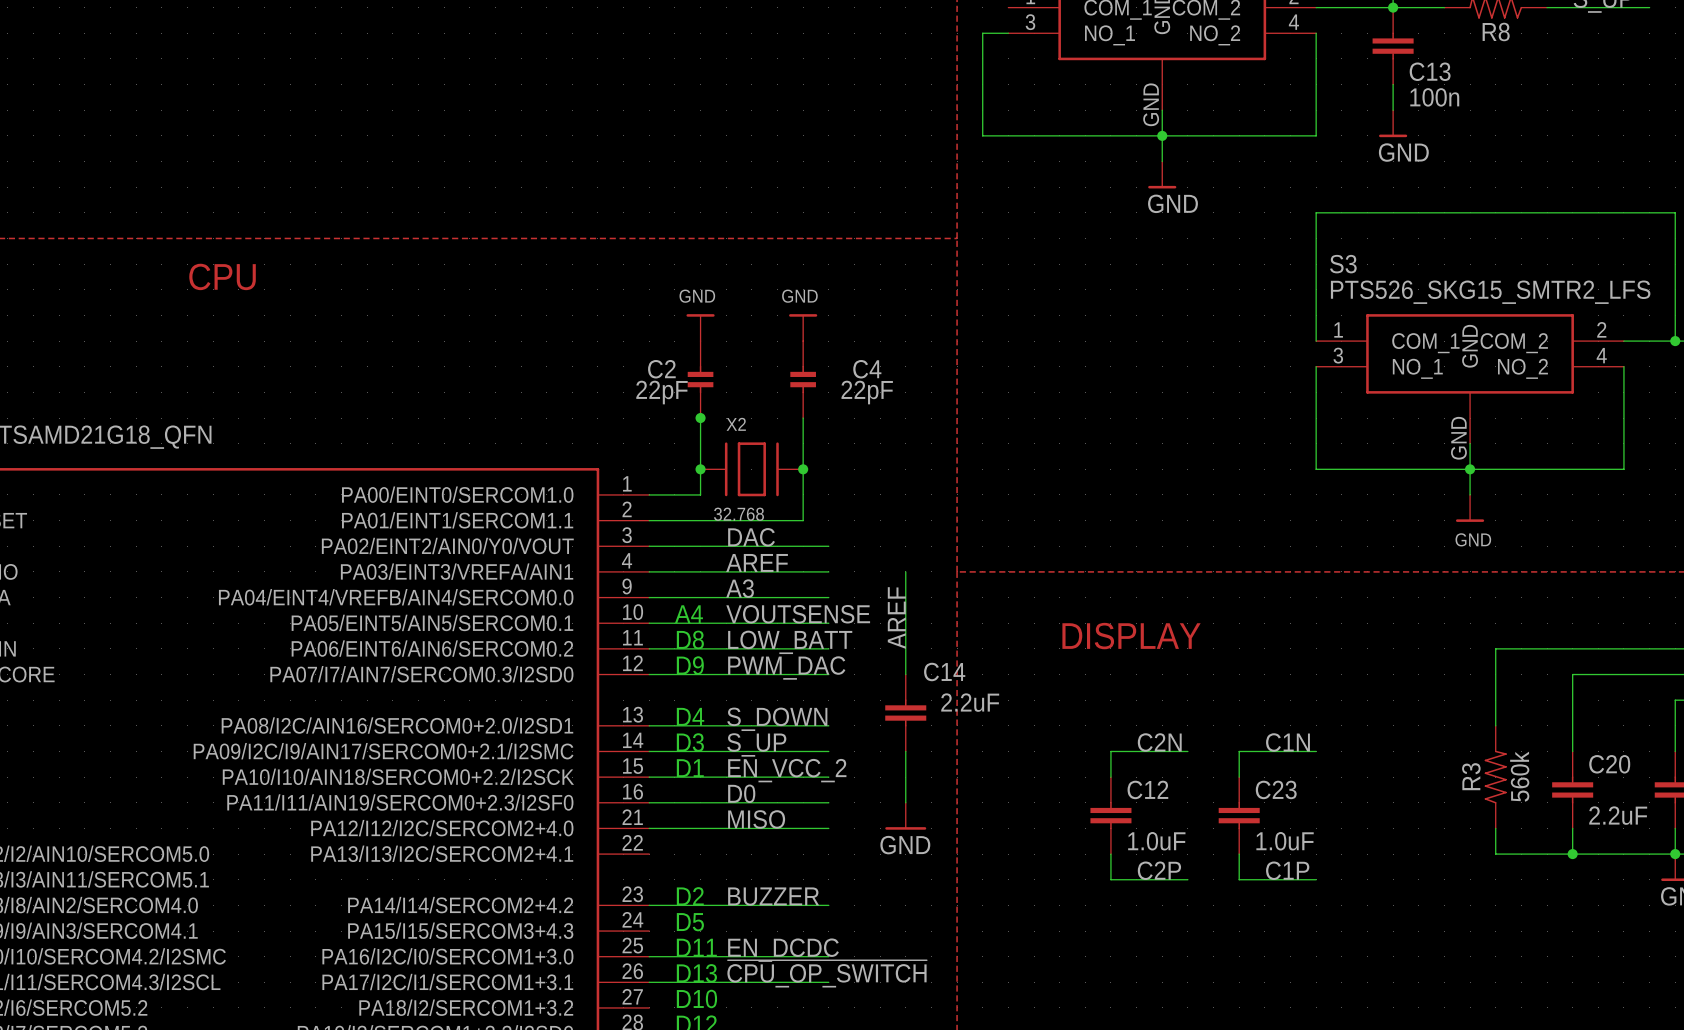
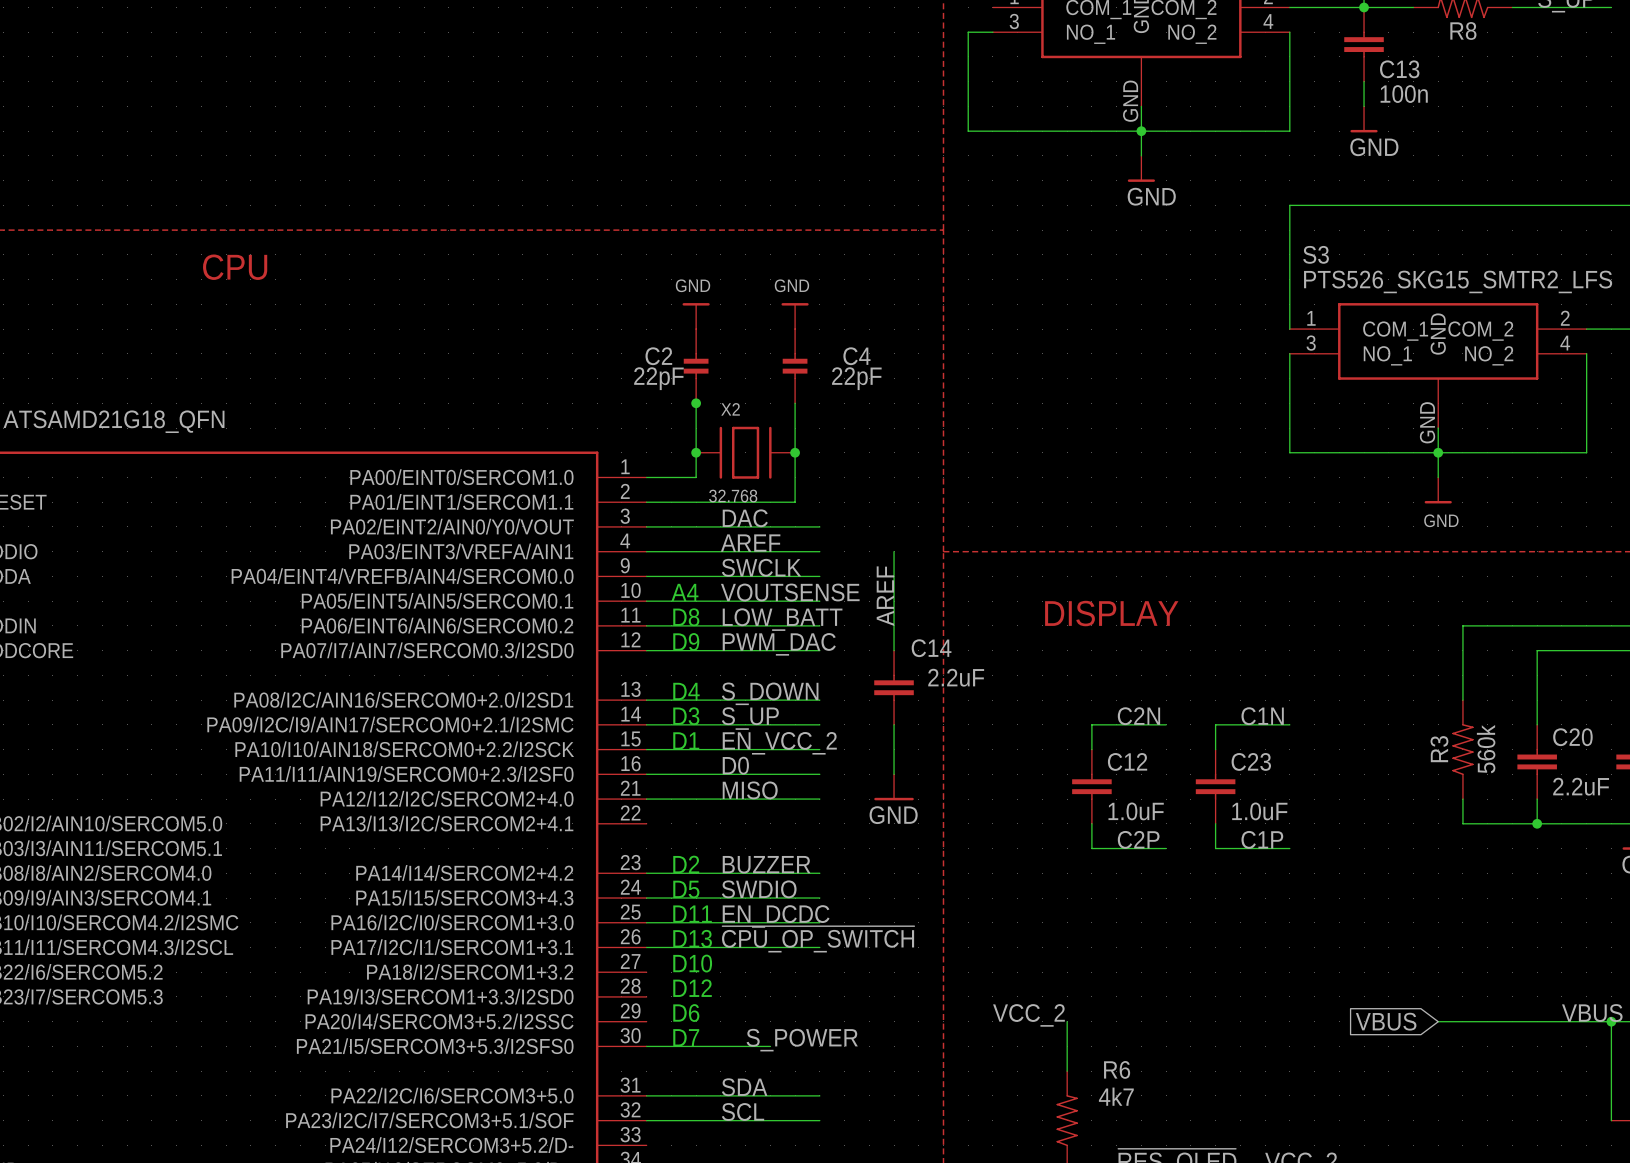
label: A3 (740, 588) -> SWCLK (761, 567)
label: none -> SWDIO (759, 889)
wire: none -> (646, 898) (819, 898)

